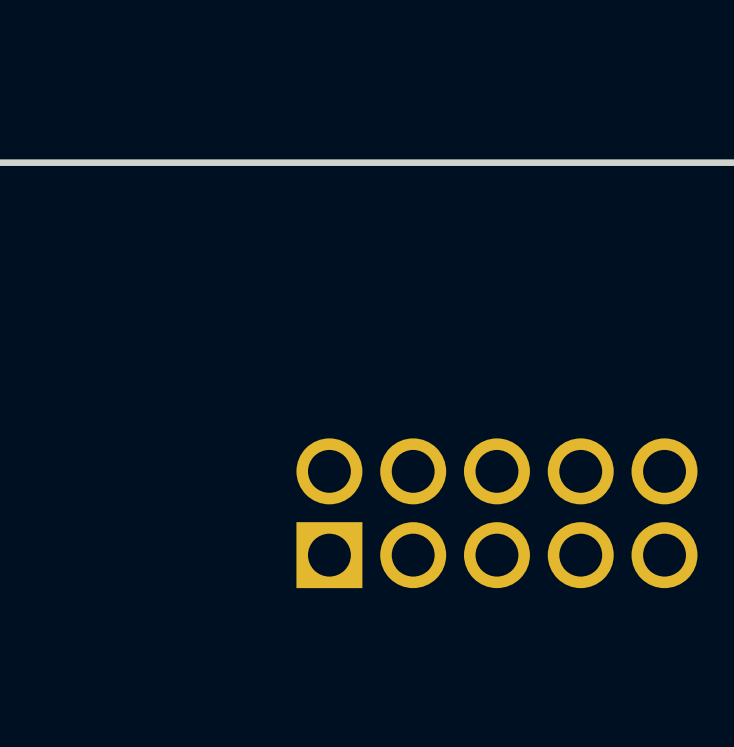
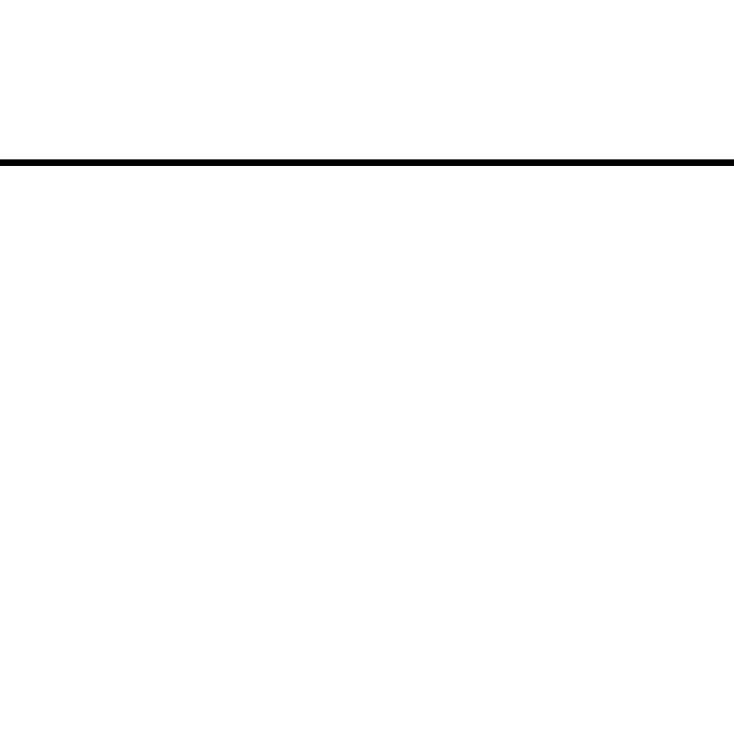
part: (496, 513) -> none

